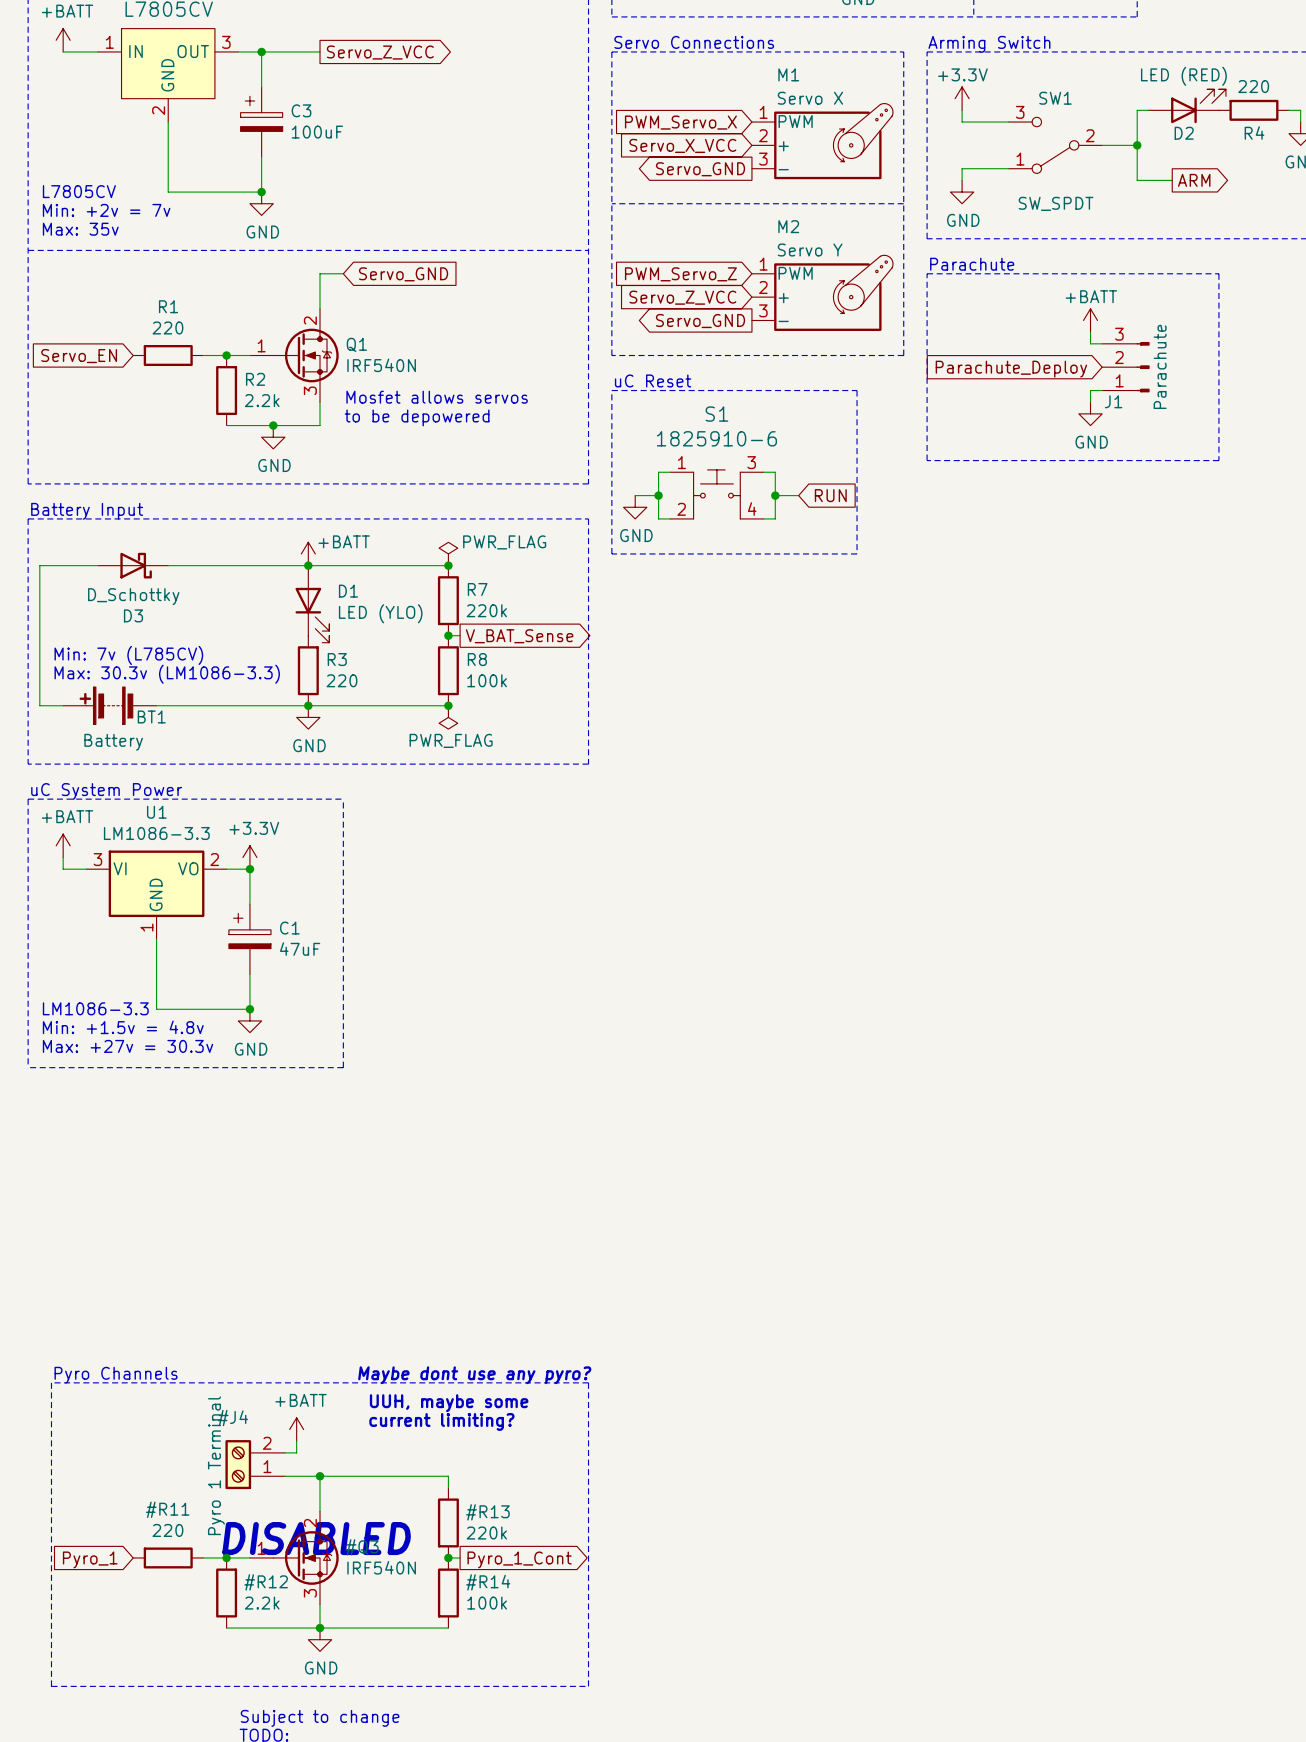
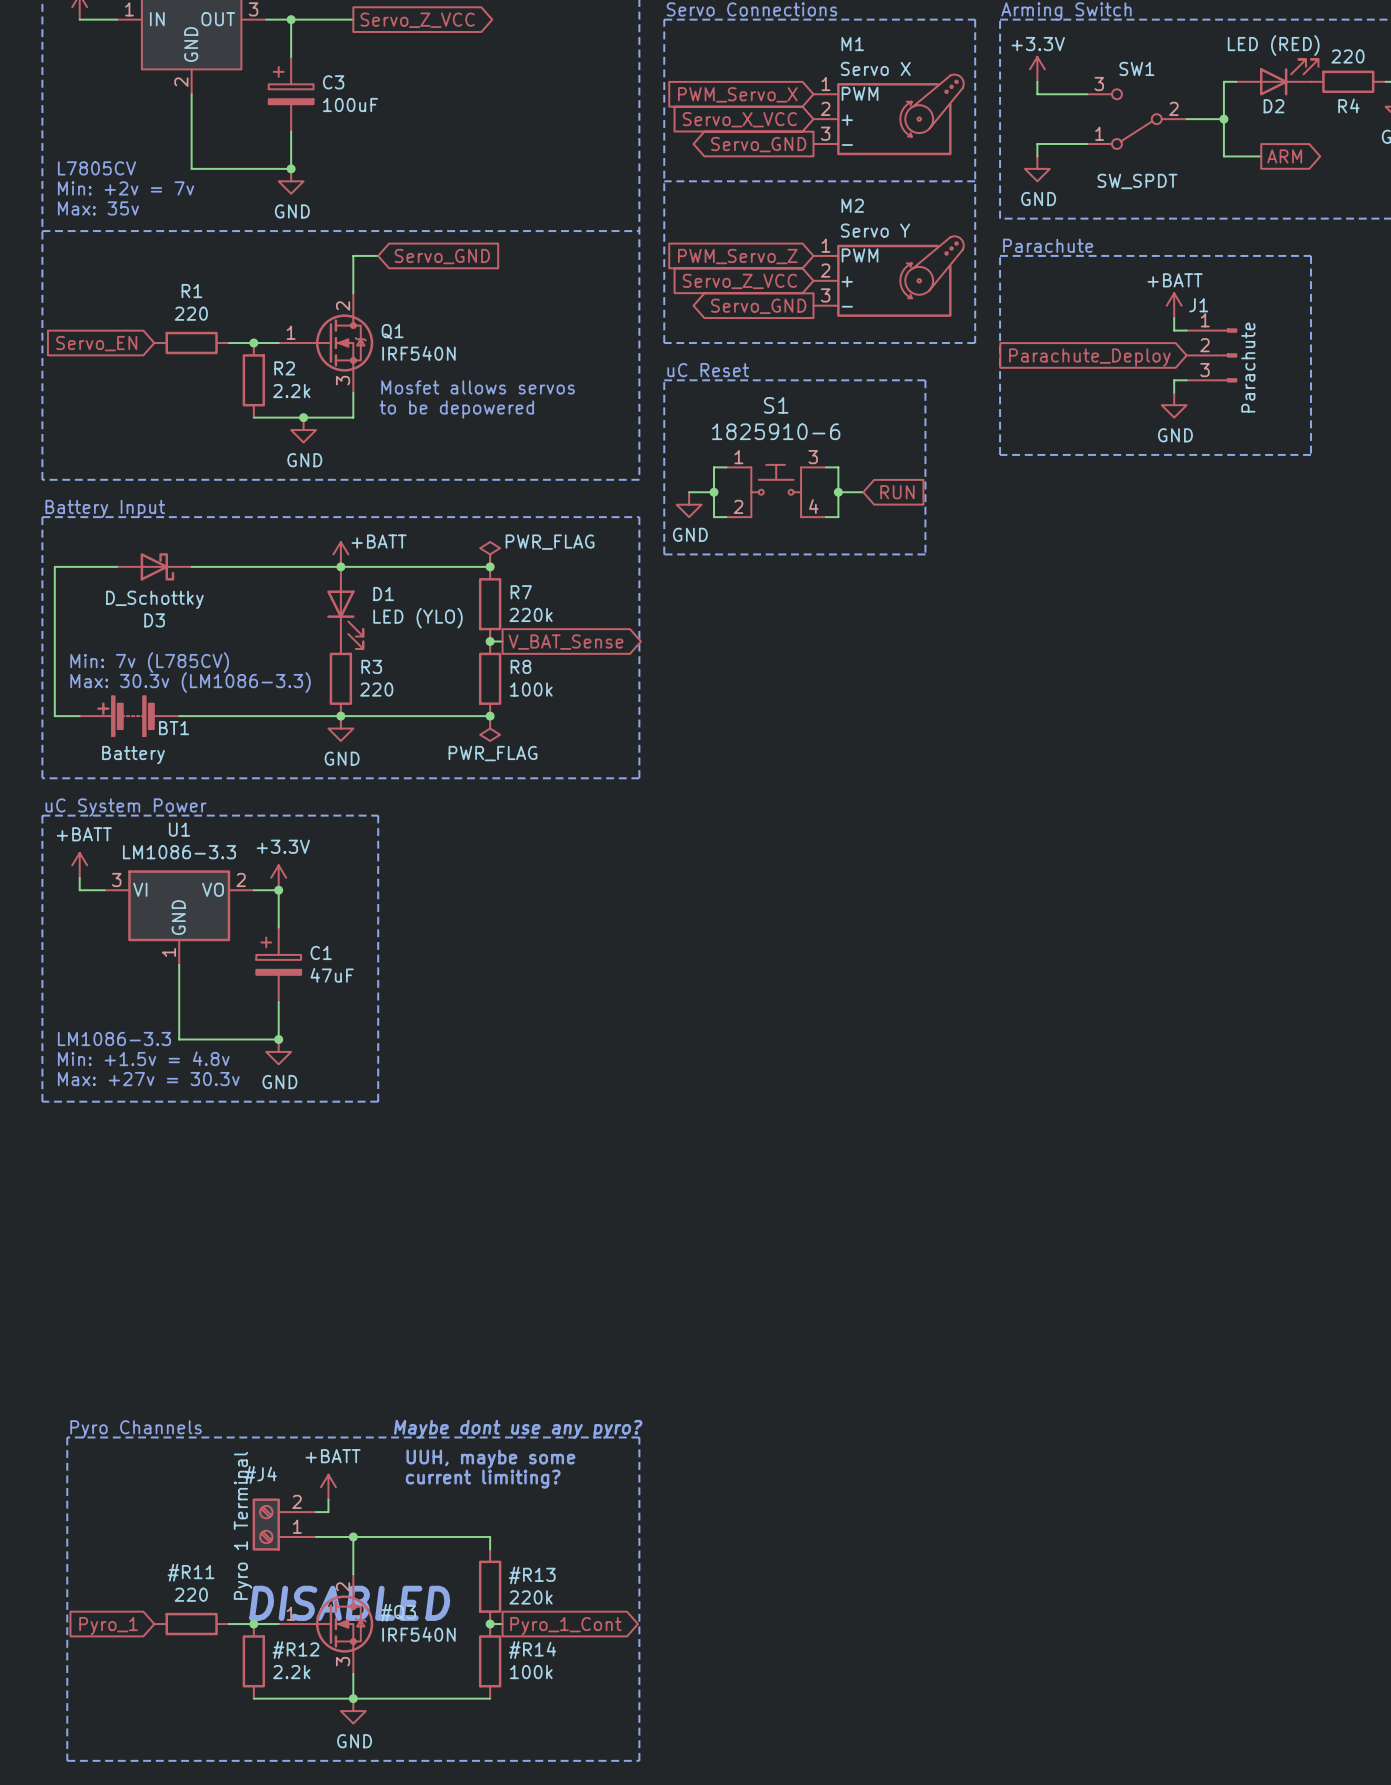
J1 flip: as is (1143, 367) -> up-down (1230, 355)

